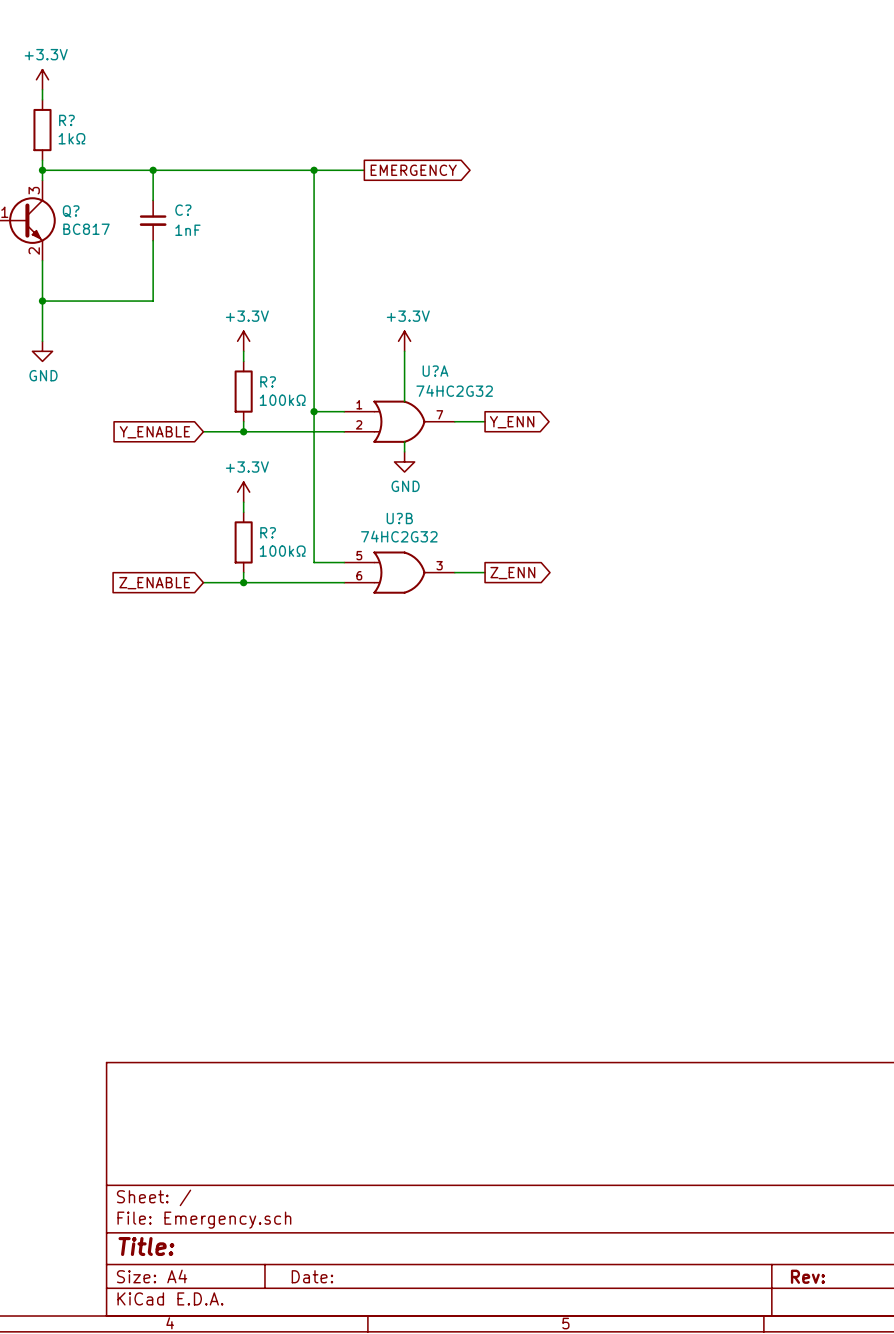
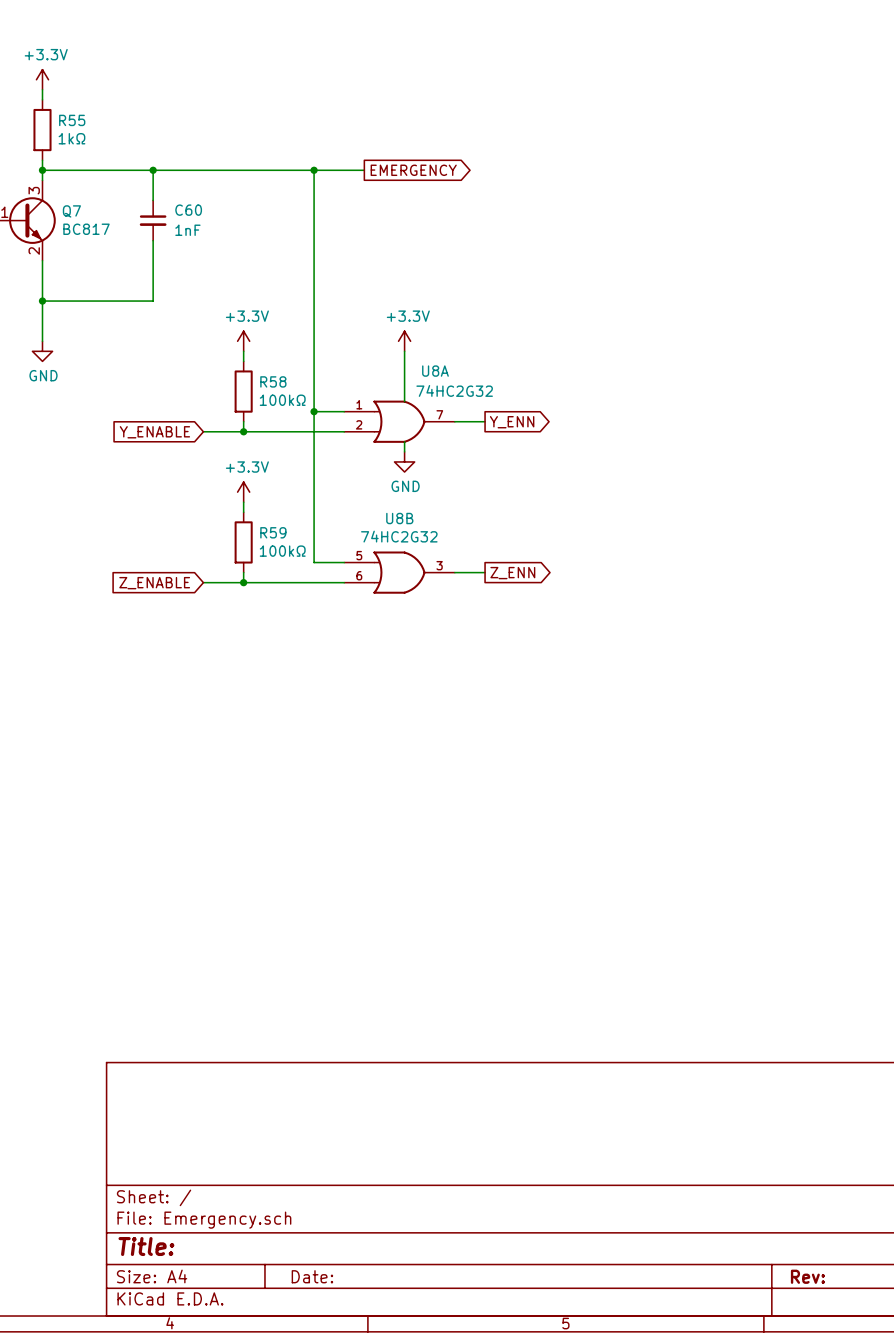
R? name: R? (66, 120) -> R55 (72, 120)
C? name: C? (183, 210) -> C60 (188, 210)
Q? name: Q? (71, 211) -> Q7 (71, 211)
U?A name: U?A (435, 371) -> U8A (435, 371)
R? name: R? (268, 381) -> R58 (273, 381)
U?B name: U?B (399, 518) -> U8B (399, 518)
R? name: R? (268, 532) -> R59 (273, 532)

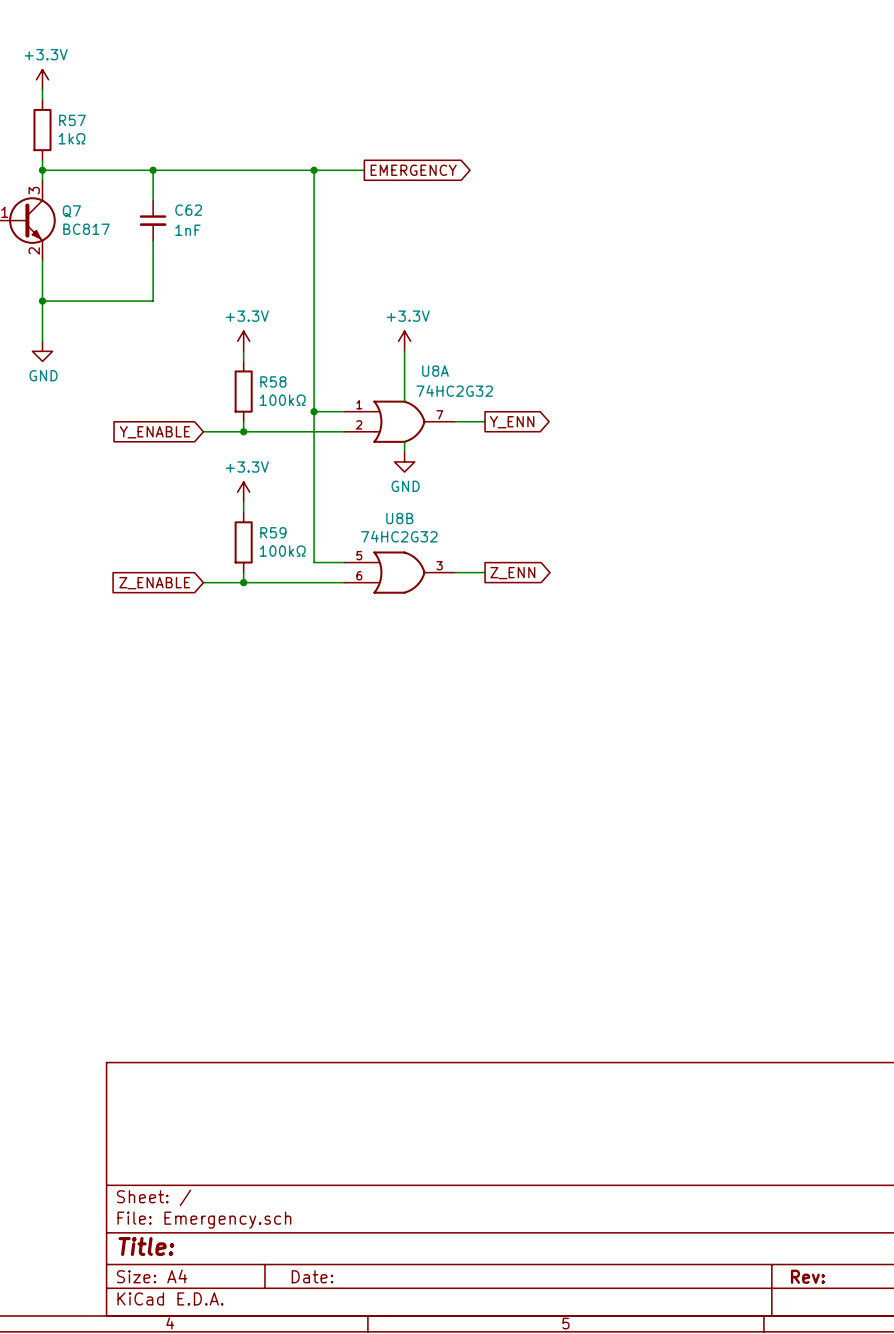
R55 name: R55 (72, 120) -> R57 (72, 120)
C60 name: C60 (188, 210) -> C62 (188, 210)

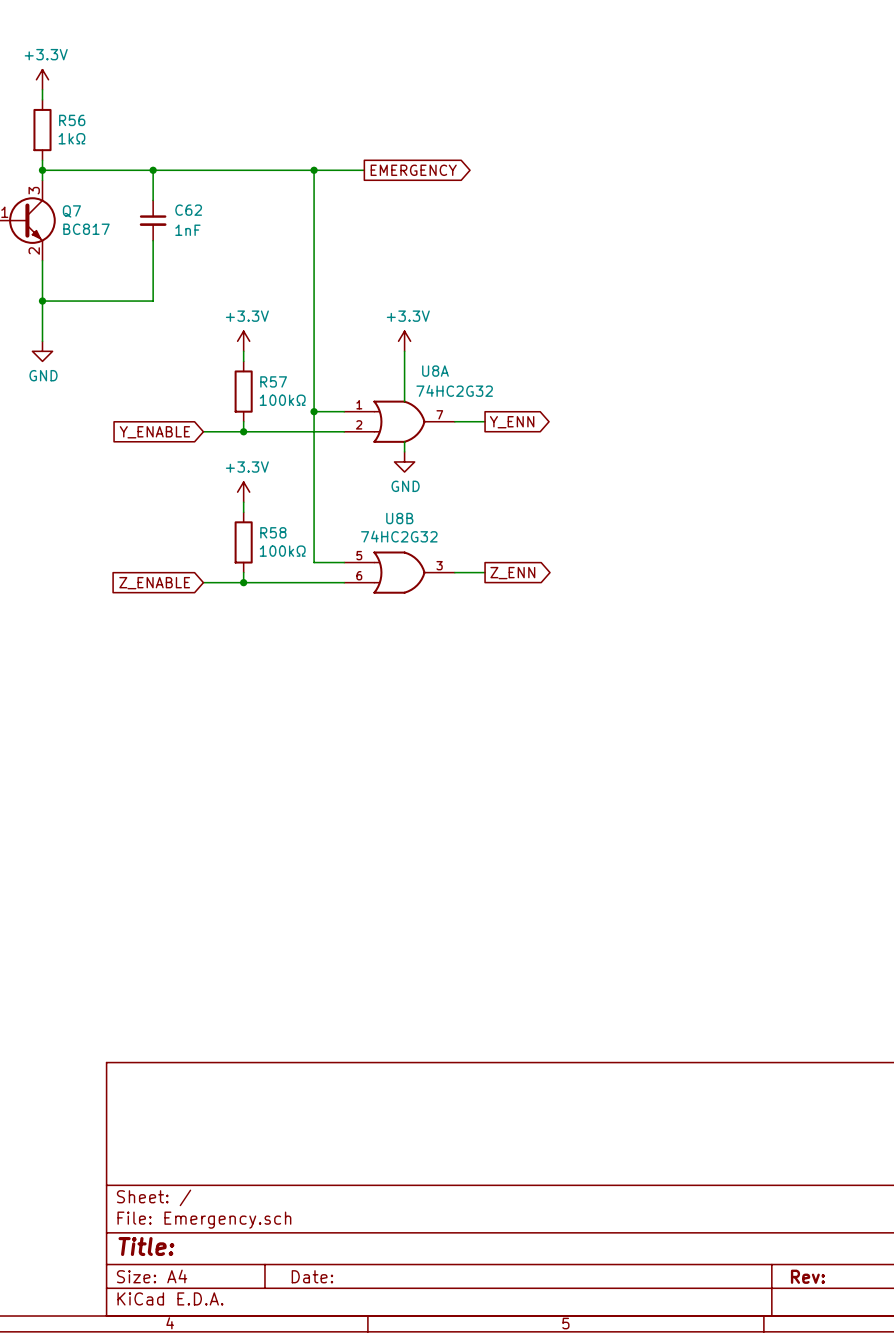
R57 name: R57 (72, 120) -> R56 (72, 120)
R58 name: R58 (273, 381) -> R57 (273, 381)
R59 name: R59 (273, 532) -> R58 (273, 532)

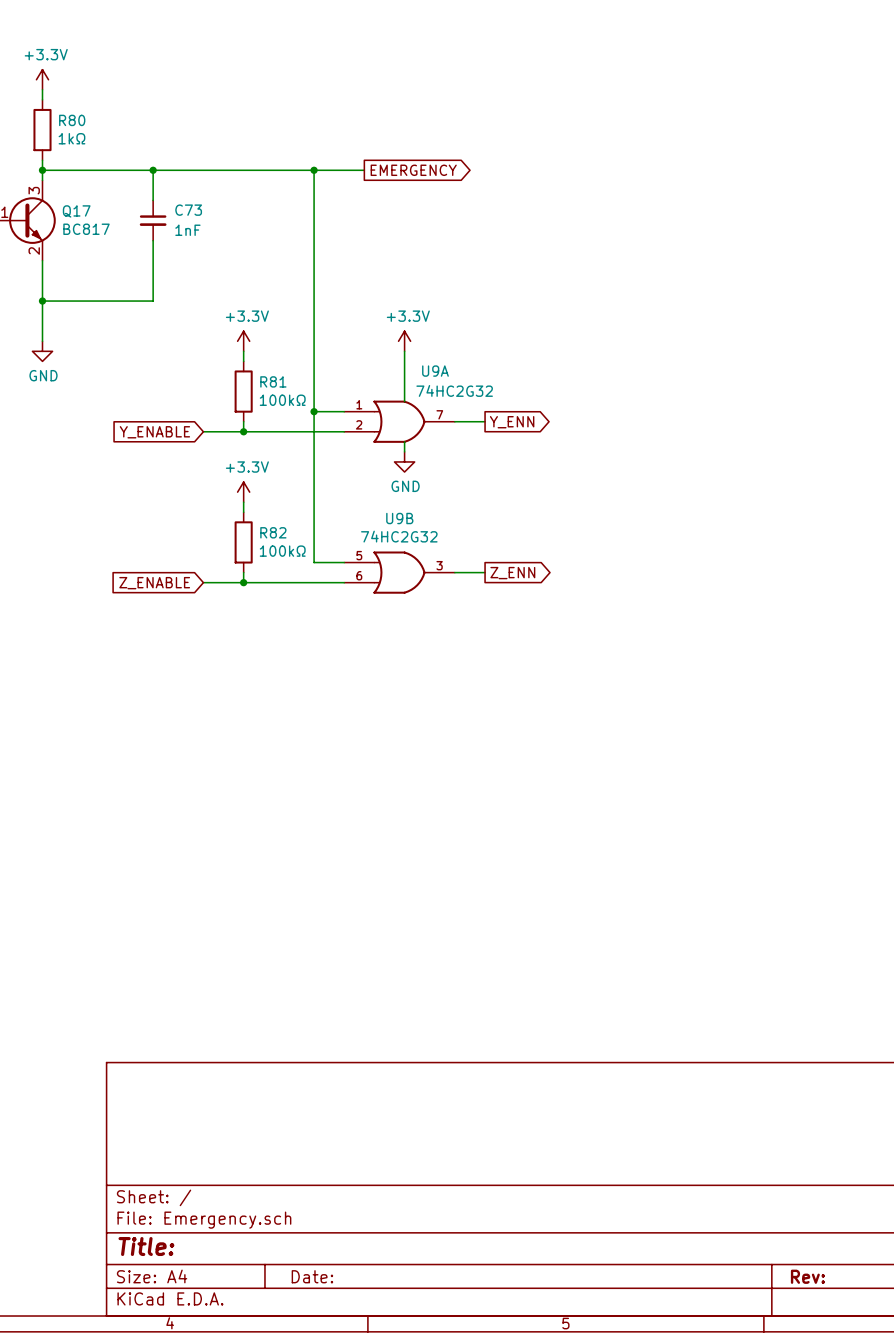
R56 name: R56 (72, 120) -> R80 (72, 120)
C62 name: C62 (188, 210) -> C73 (188, 210)
Q7 name: Q7 (71, 211) -> Q17 (76, 211)
U8A name: U8A (435, 371) -> U9A (435, 371)
R57 name: R57 (273, 381) -> R81 (273, 381)
U8B name: U8B (399, 518) -> U9B (399, 518)
R58 name: R58 (273, 532) -> R82 (273, 532)

